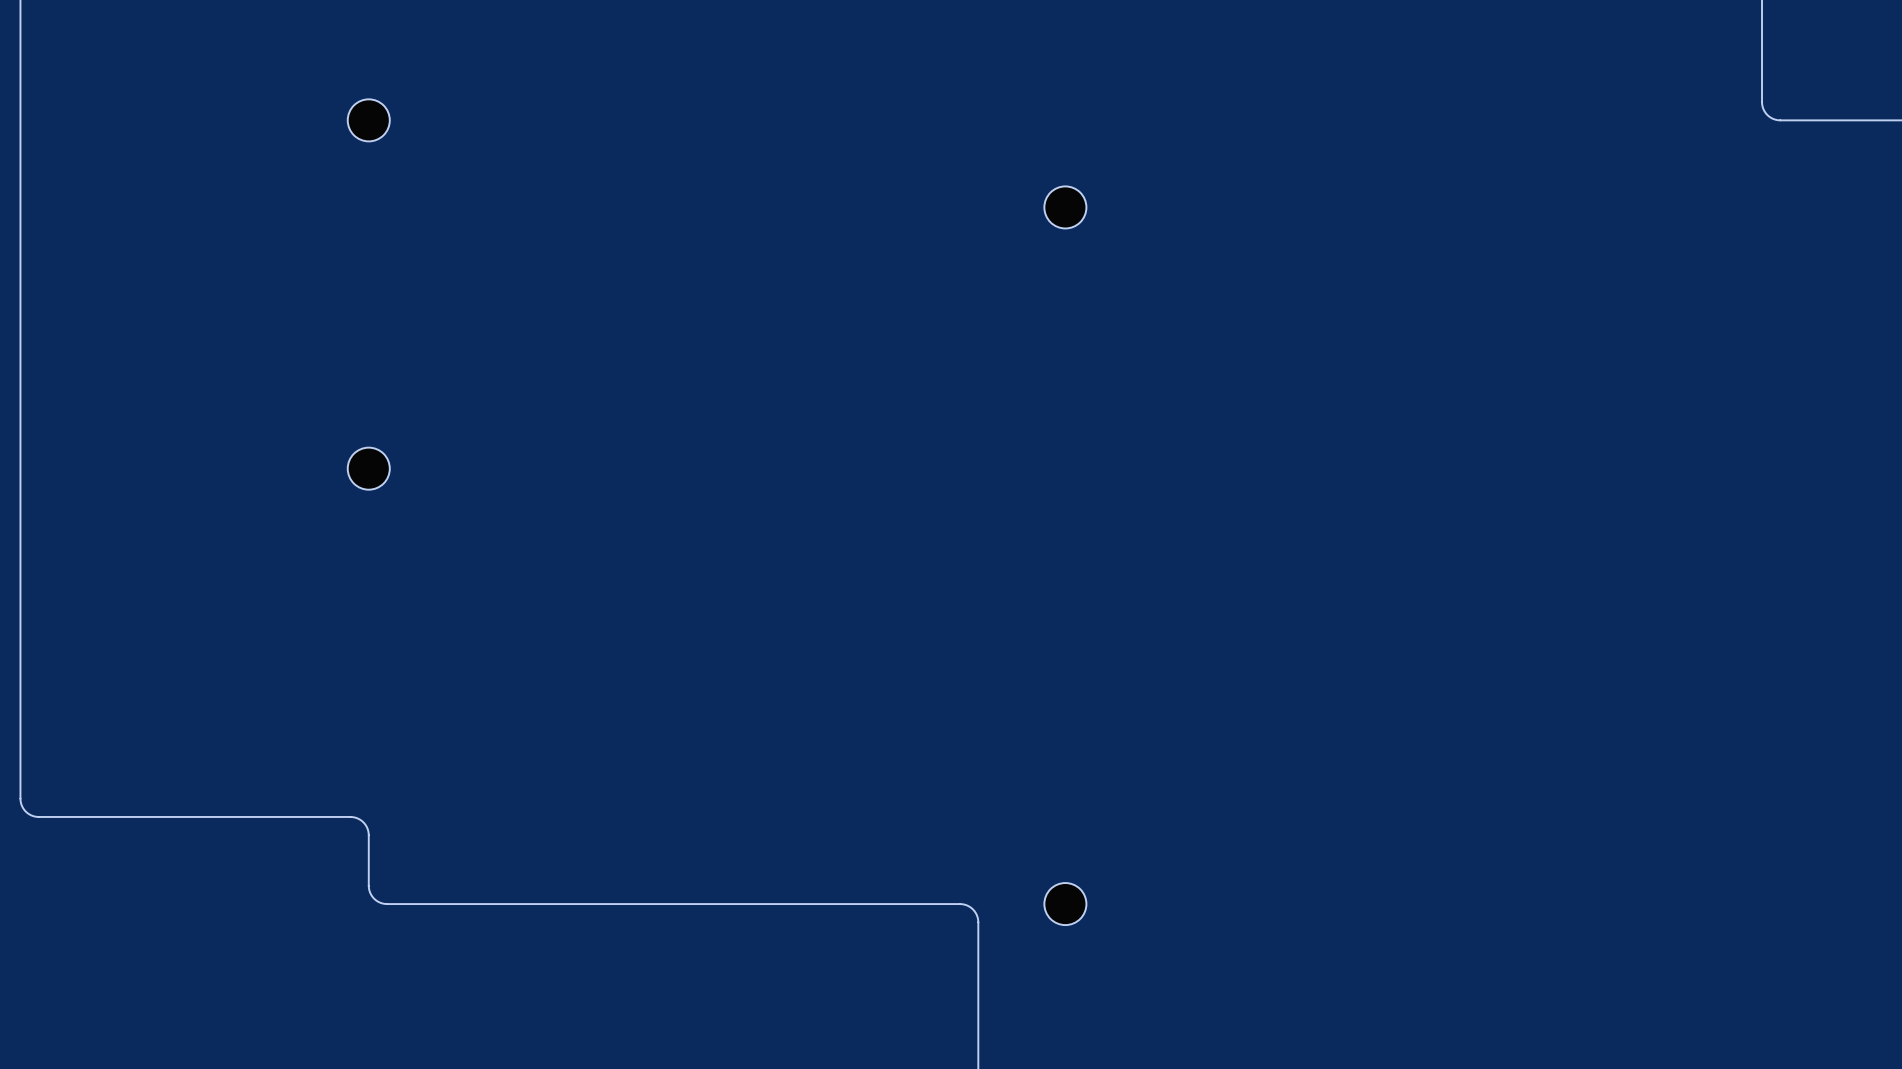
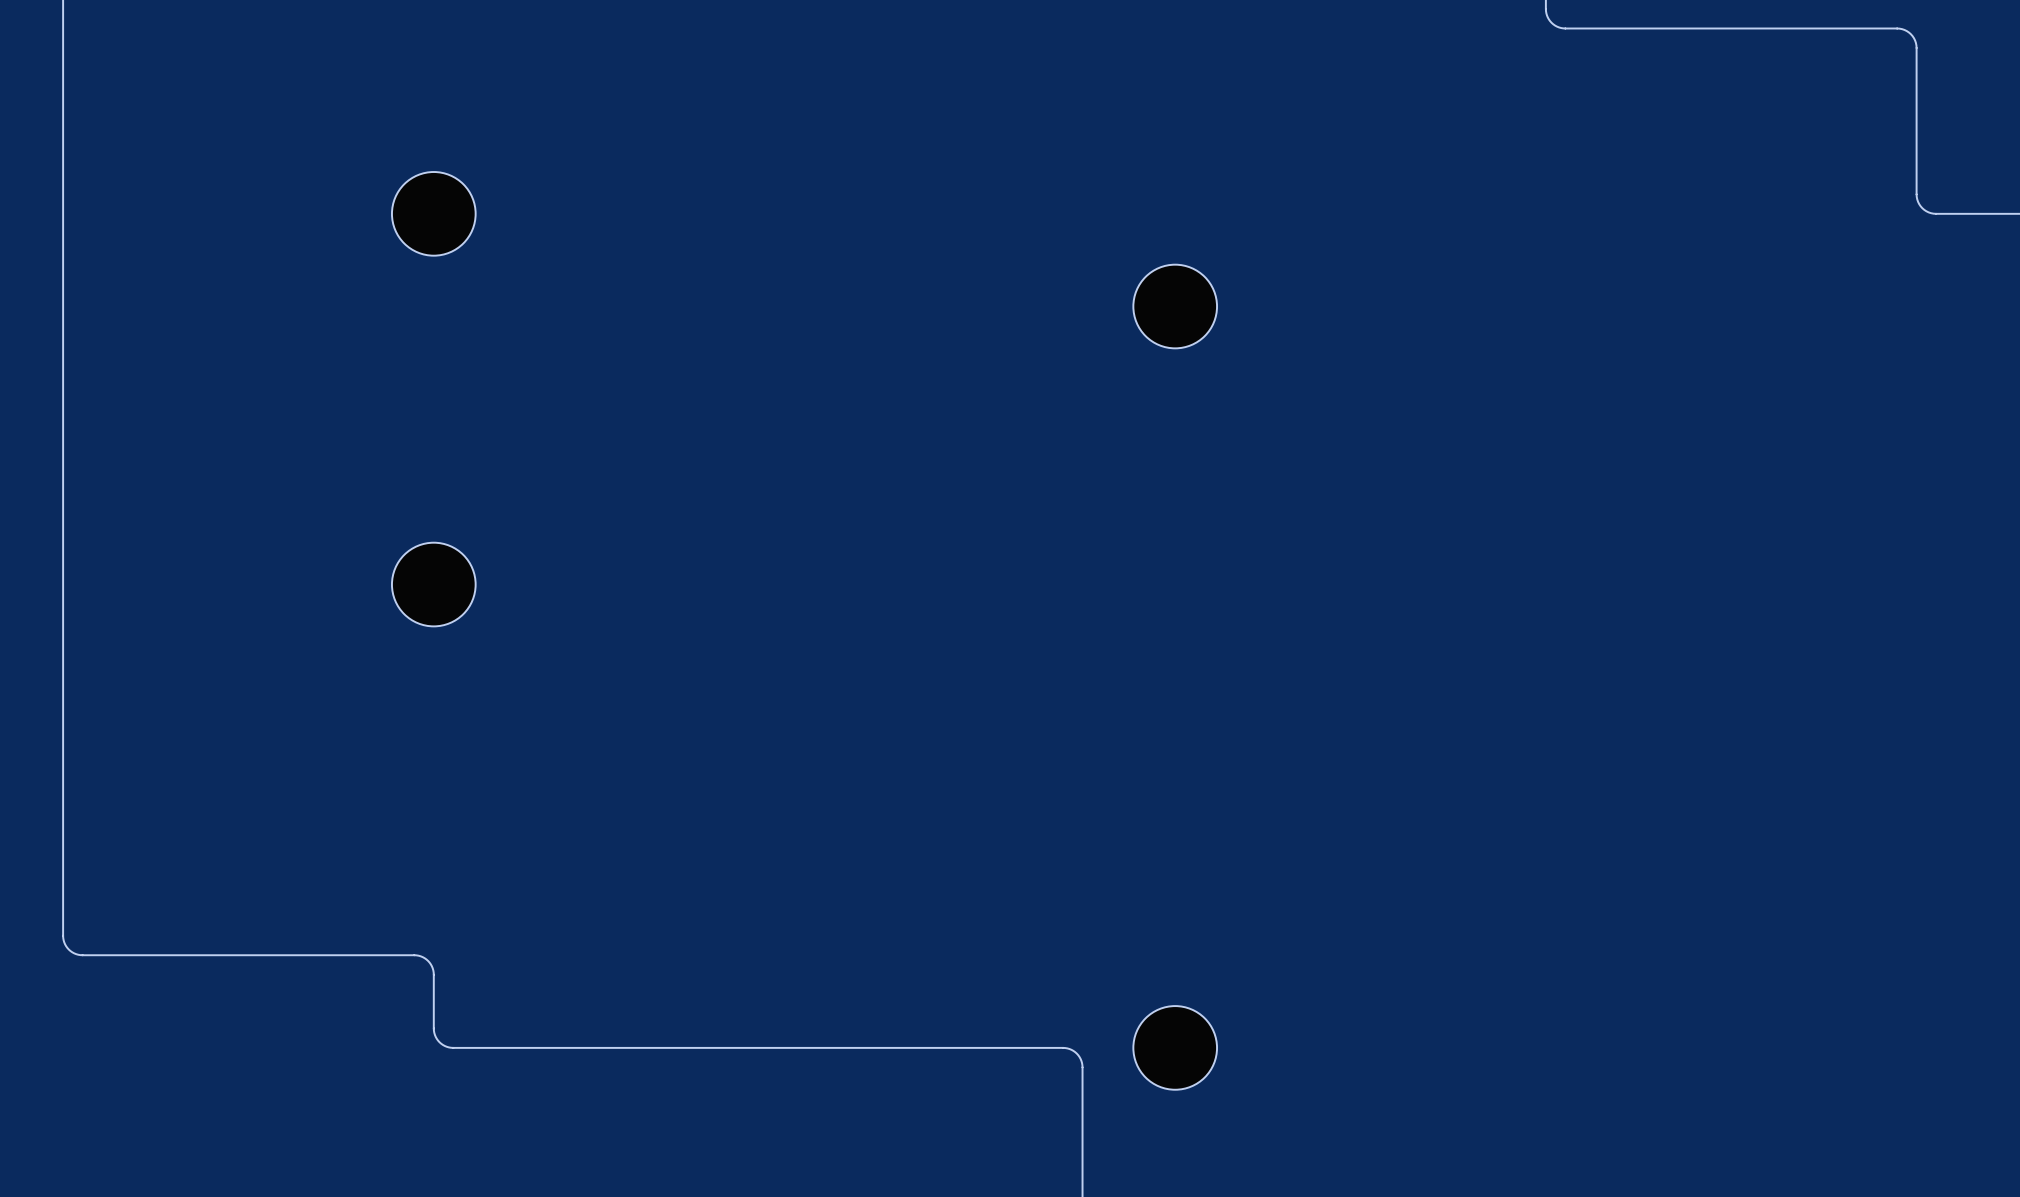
part footprint: [347, 99, 390, 142] -> [391, 172, 476, 256]
part footprint: [1044, 186, 1087, 229] -> [1133, 264, 1218, 349]
part footprint: [347, 447, 390, 490] -> [391, 542, 476, 627]
part footprint: [1044, 883, 1087, 926] -> [1133, 1006, 1218, 1090]

